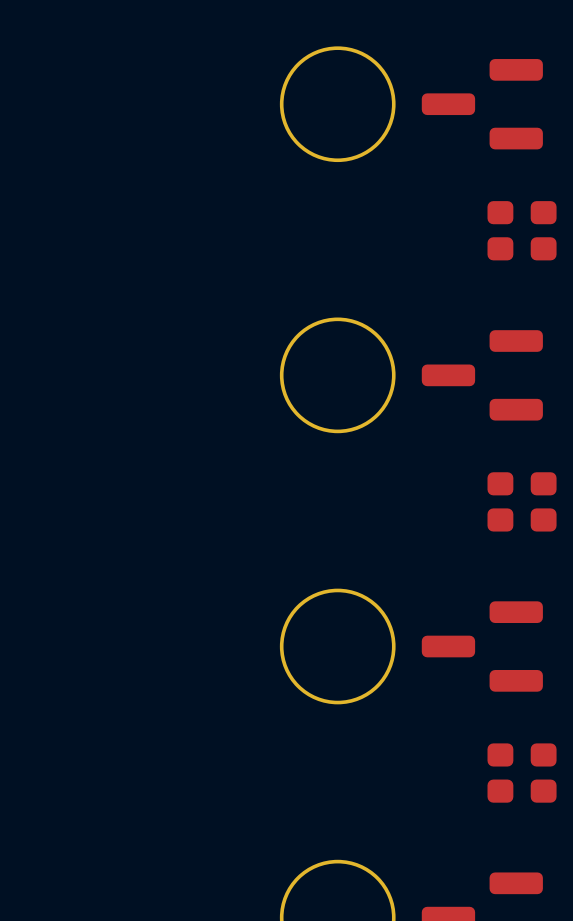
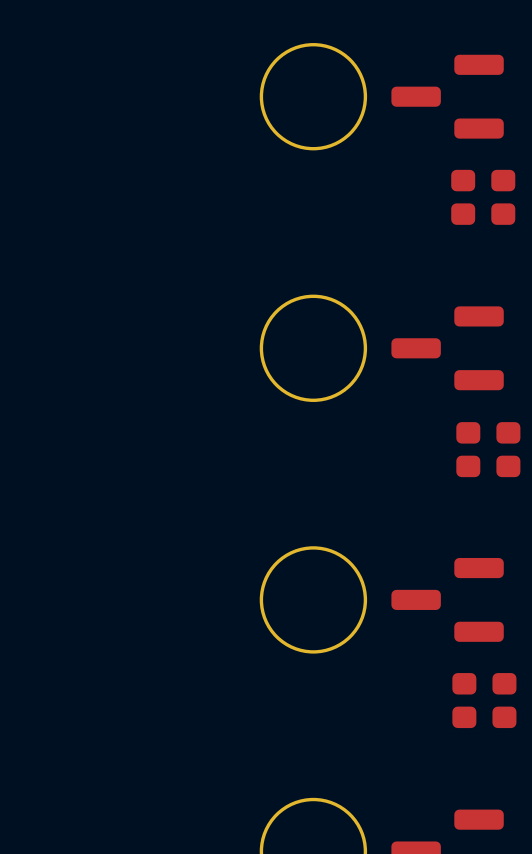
part: none -> (483, 180)
part: (522, 212) -> none
part: none -> (483, 214)
part: (522, 248) -> none
part: none -> (488, 432)
part: (522, 483) -> none
part: none -> (488, 466)
part: (522, 519) -> none
part: none -> (484, 683)
part: (522, 754) -> none
part: none -> (484, 717)
part: (522, 791) -> none

